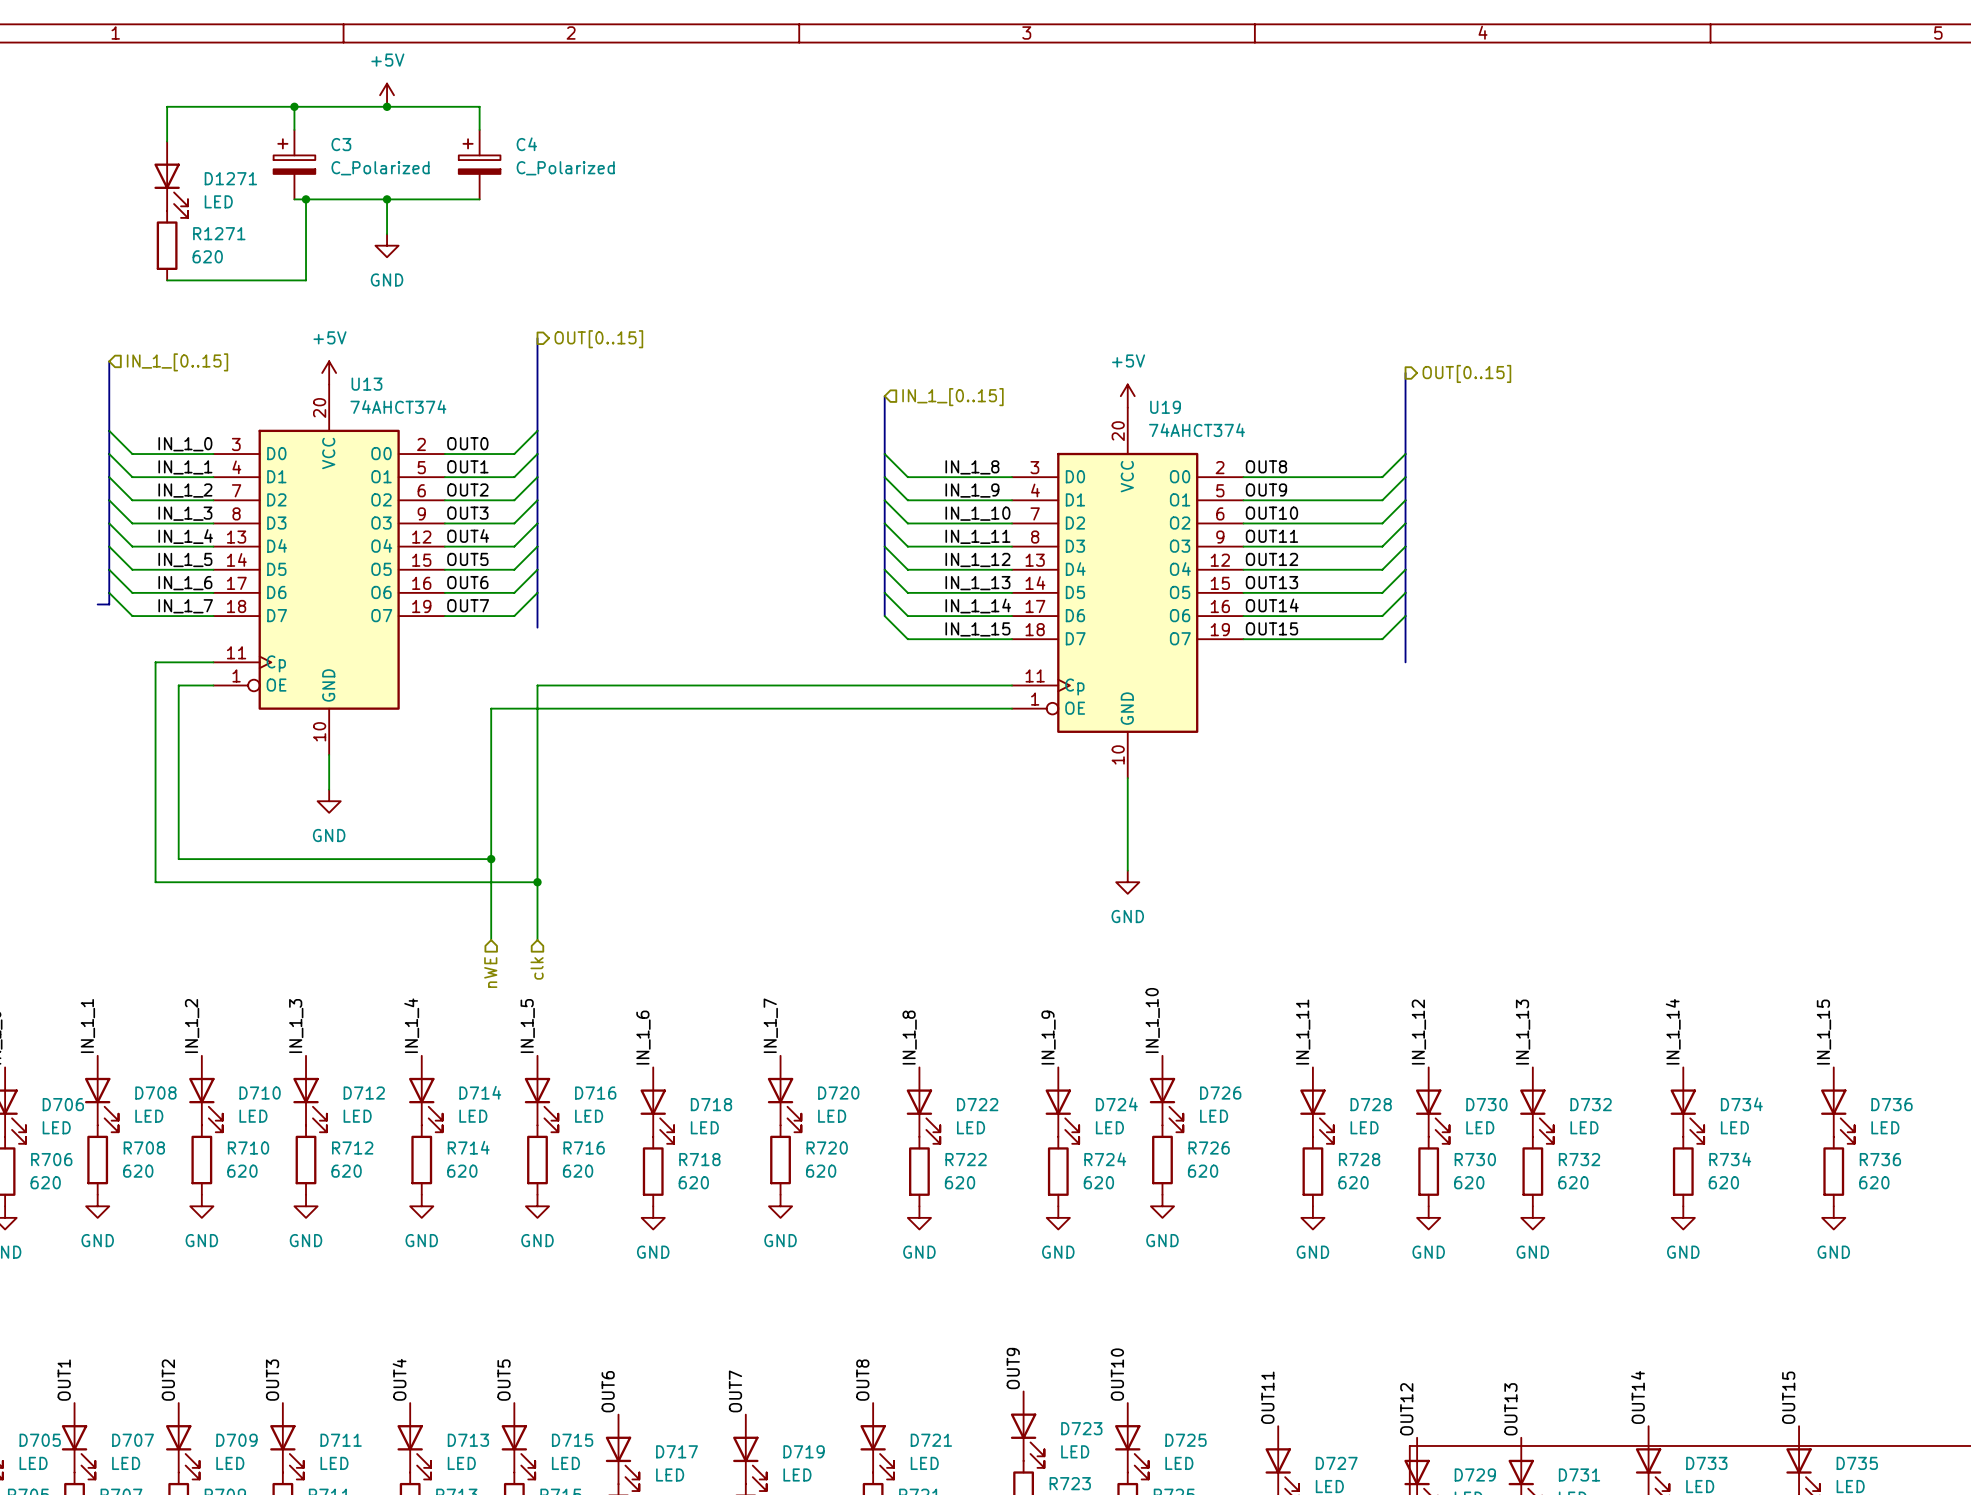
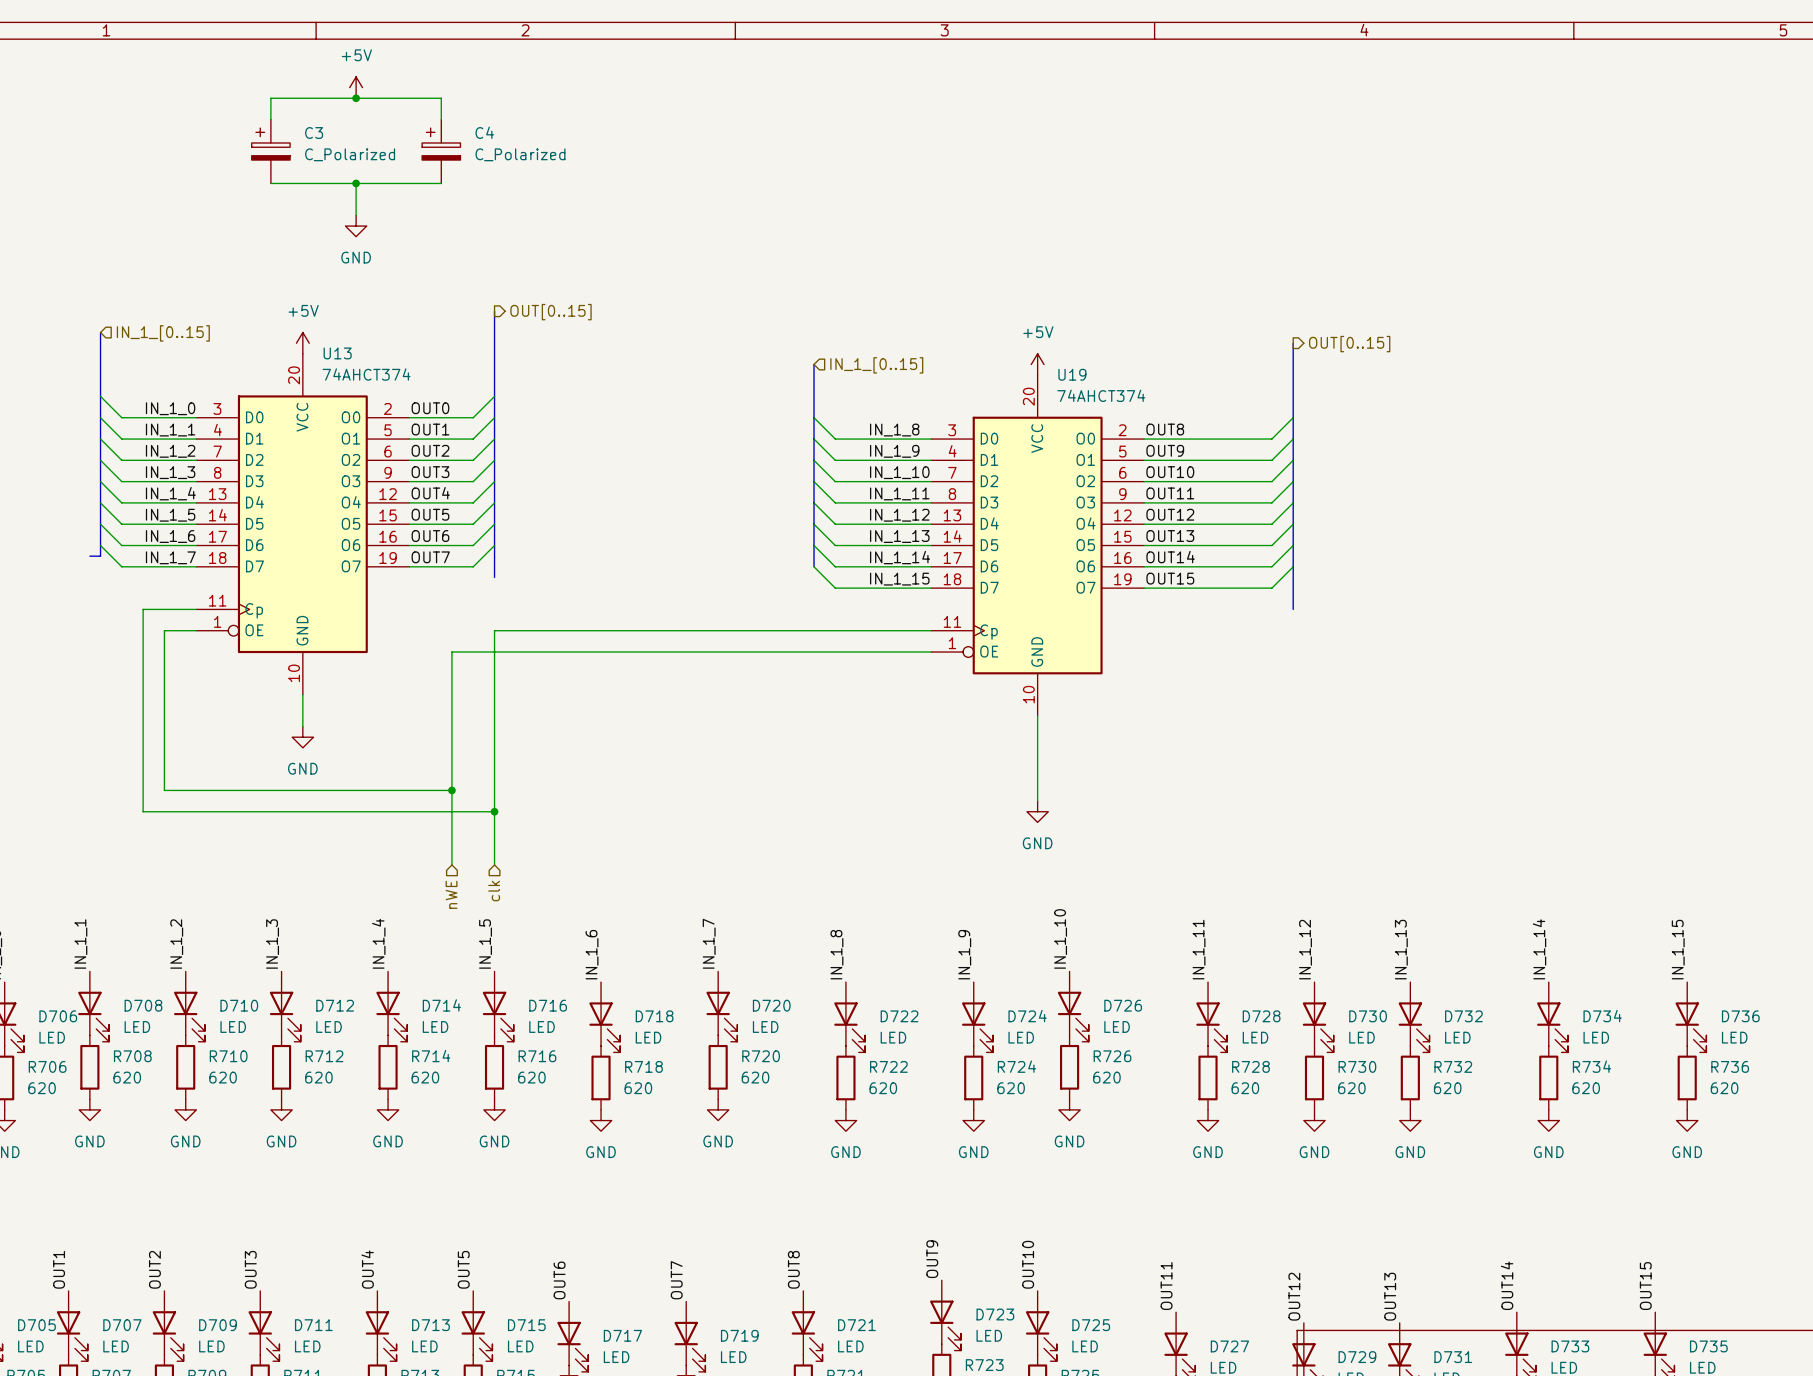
wire: (294, 106) (167, 106) (167, 141) -> none
junction: (294, 106) -> none
D1271: LED (171, 179) -> none
wire: (306, 199) (306, 280) (167, 280) -> none
junction: (306, 199) -> none
R1271: 620 (167, 245) -> none

